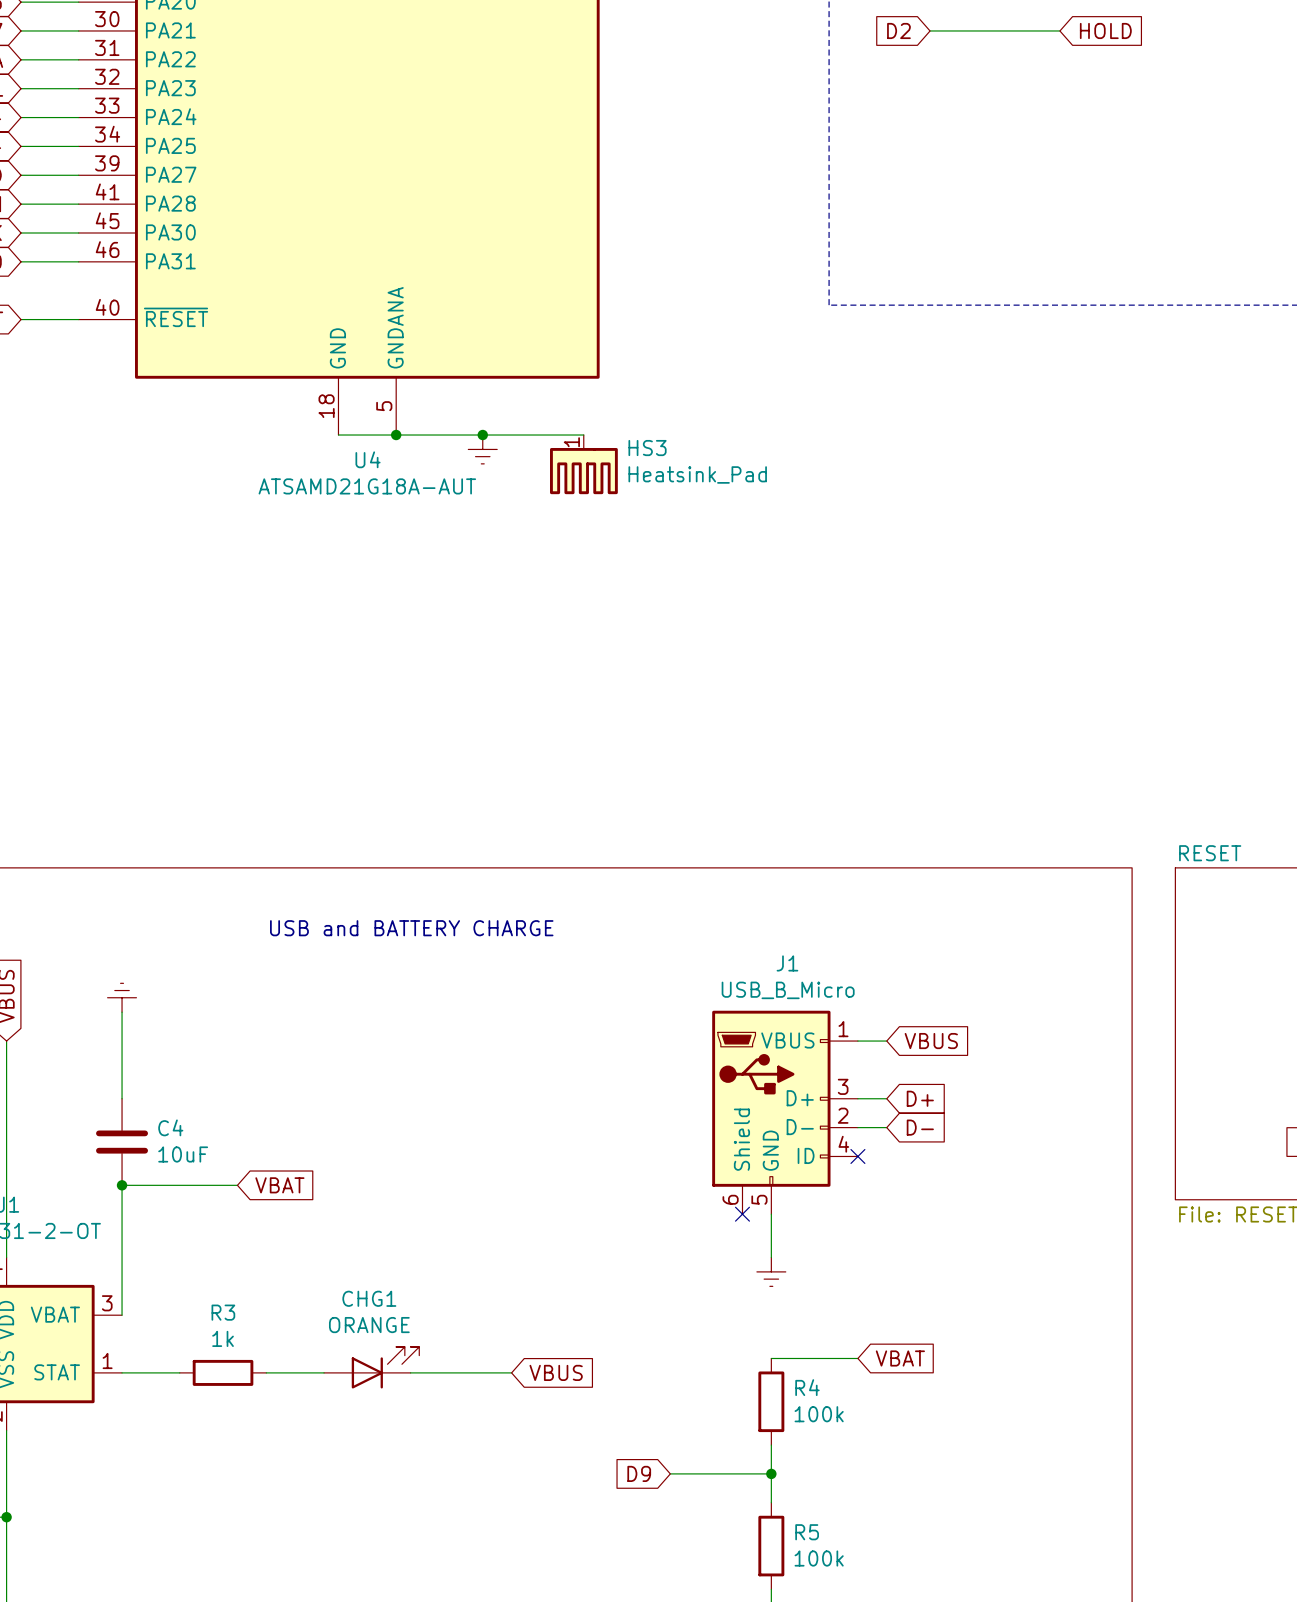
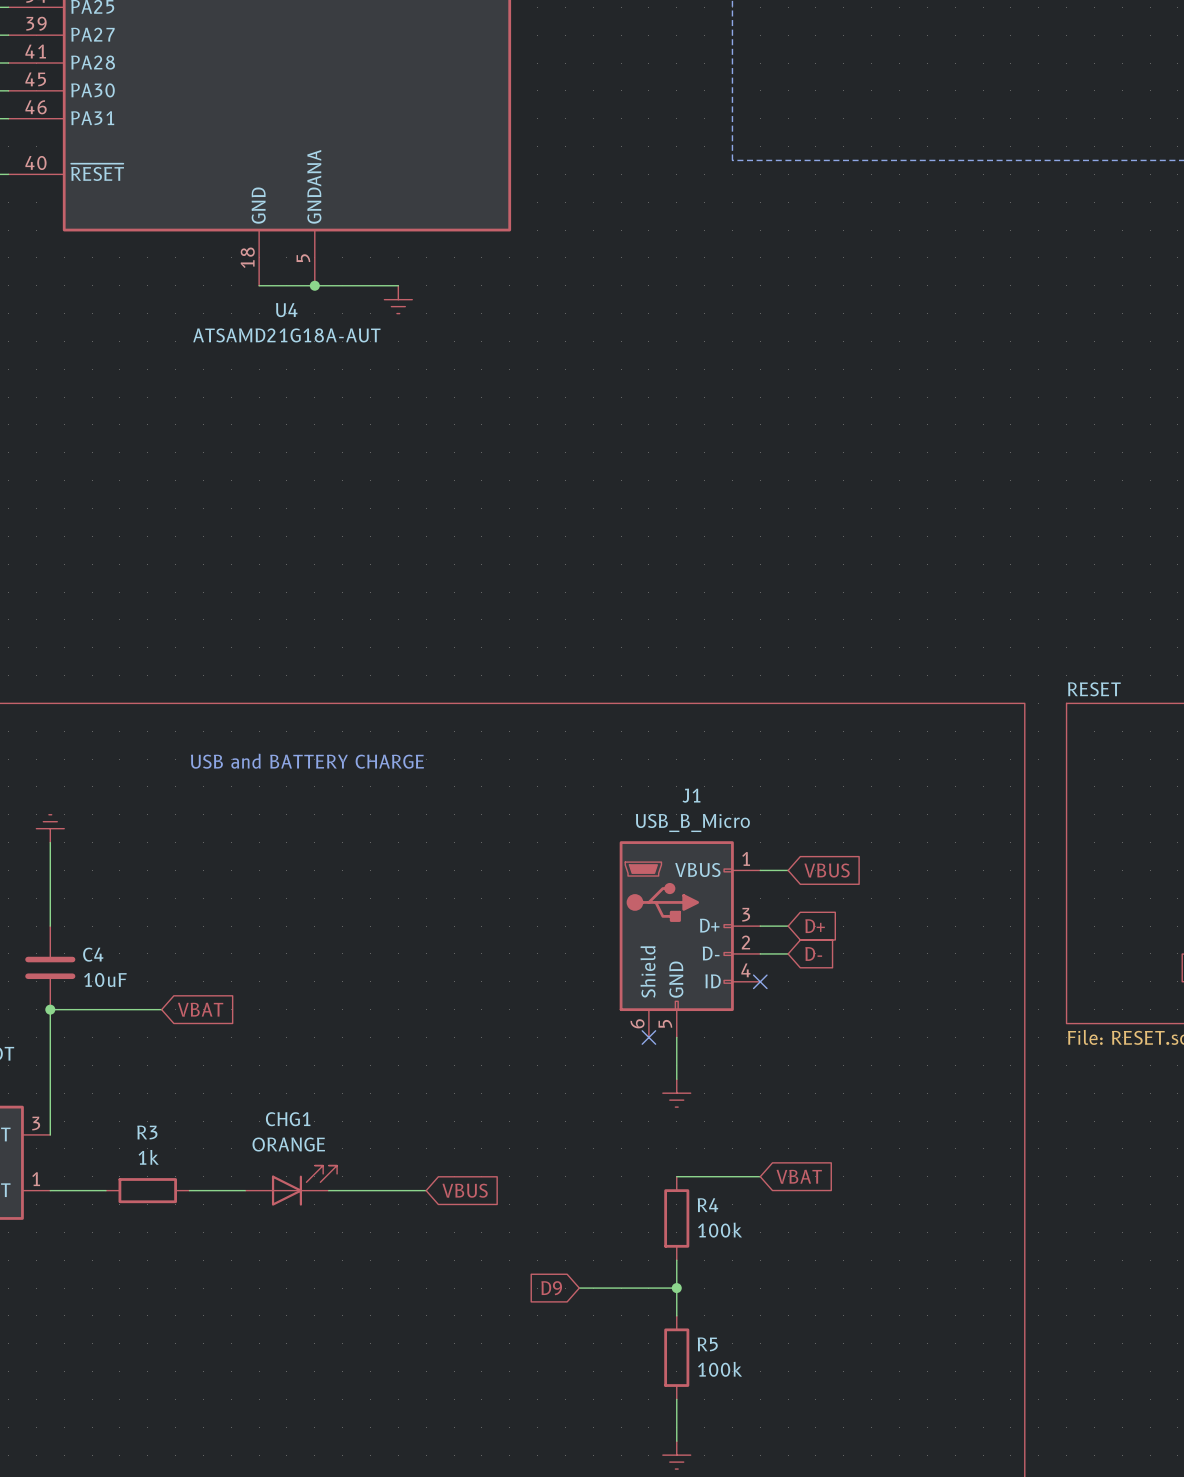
wire: (482, 435) (583, 435) -> none
junction: (482, 435) -> none
HS3: Heatsink_Pad (583, 464) -> none

